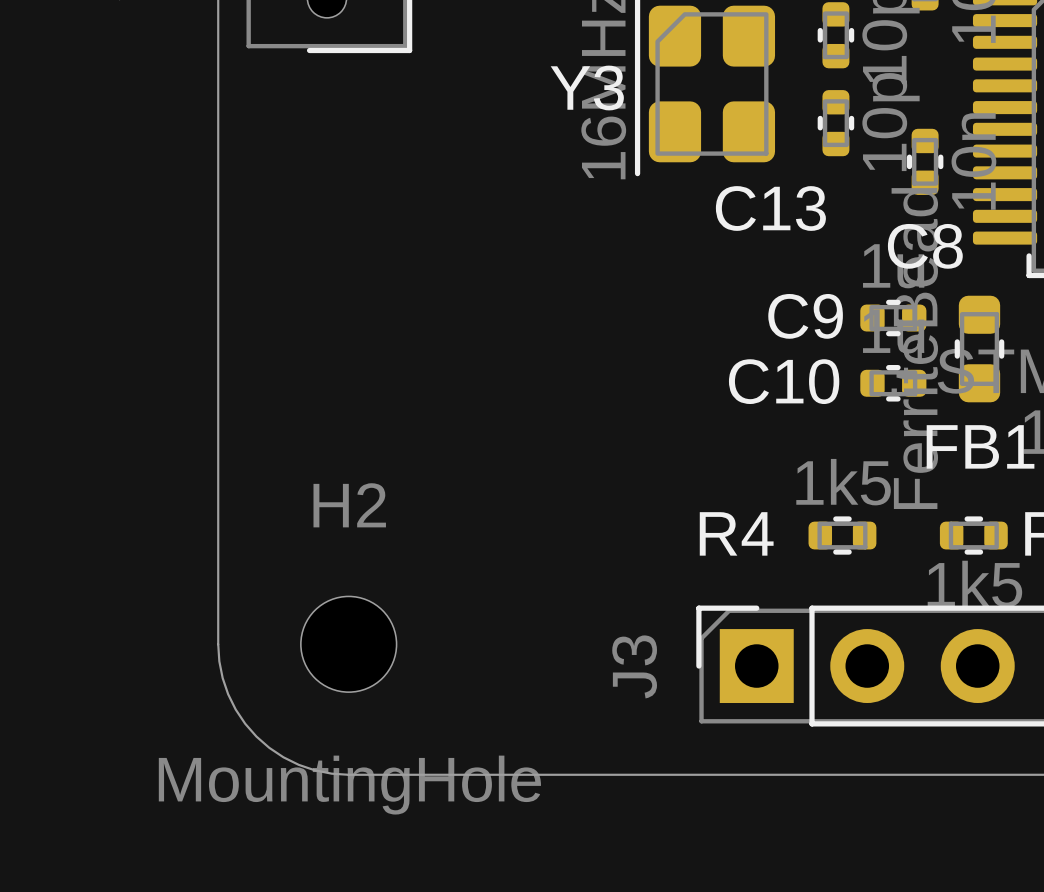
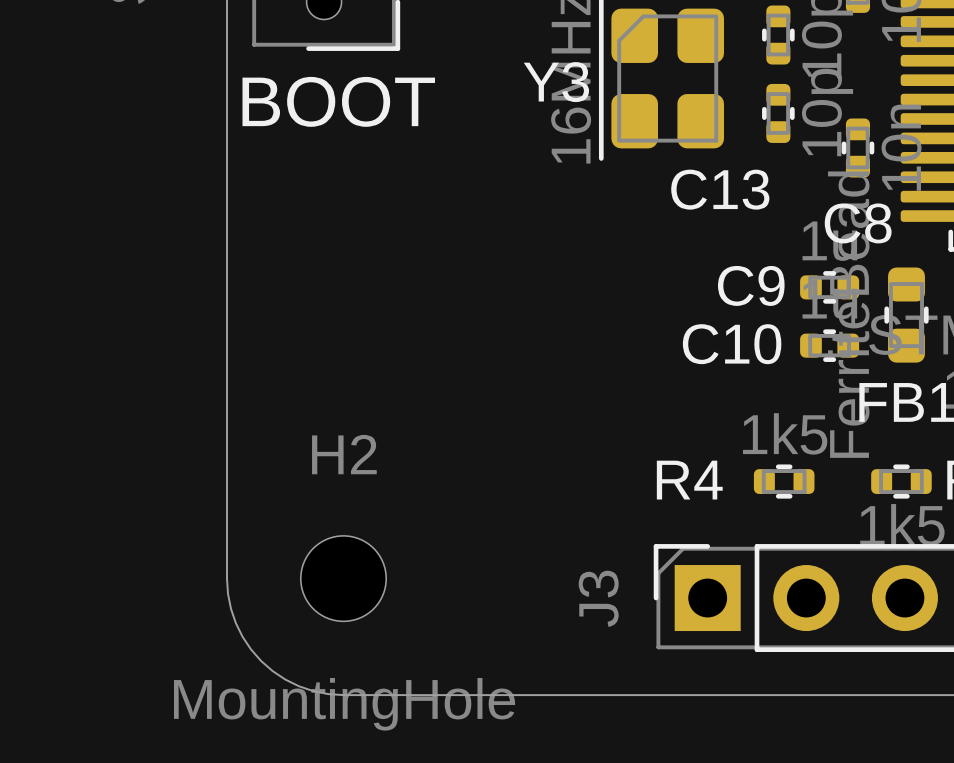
text: none -> BOOT (338, 101)

